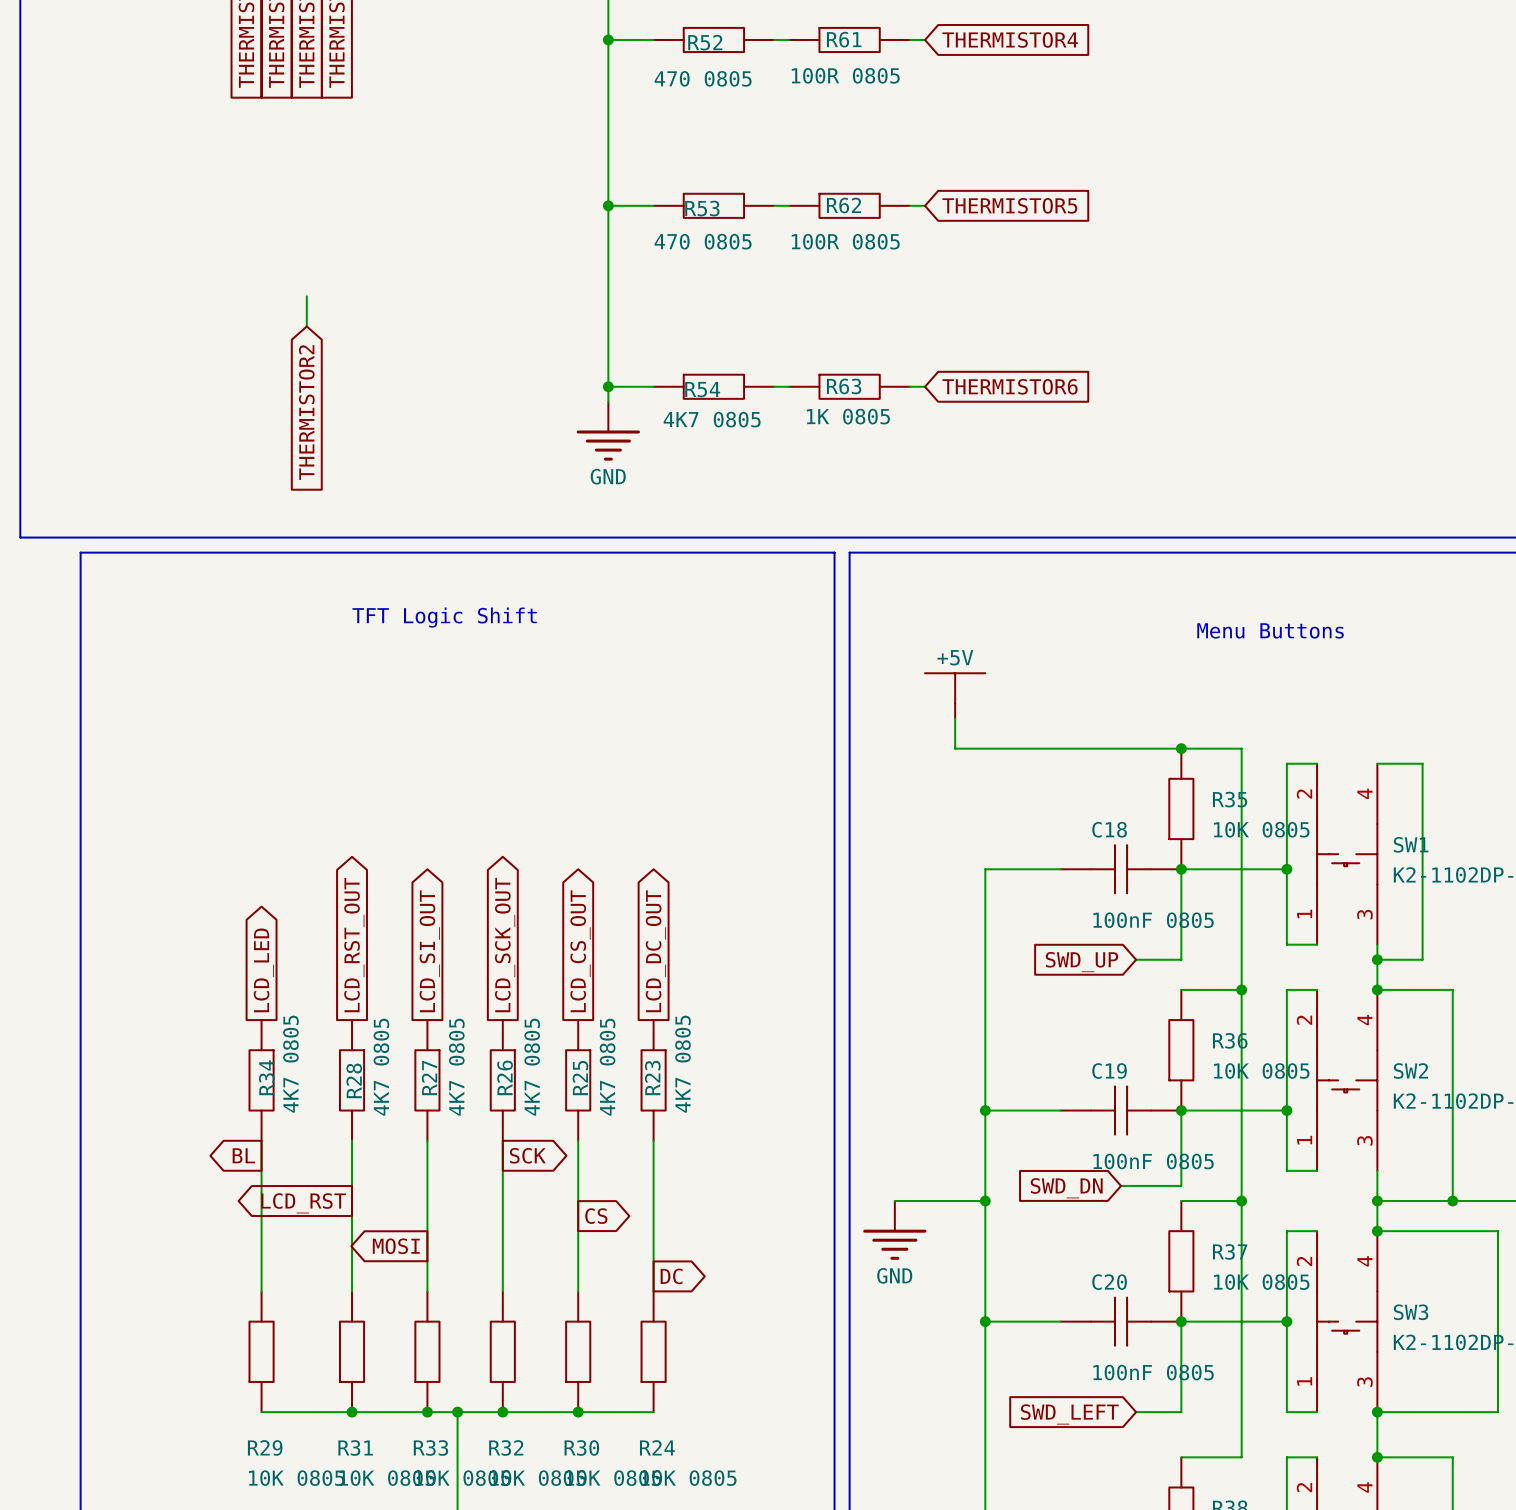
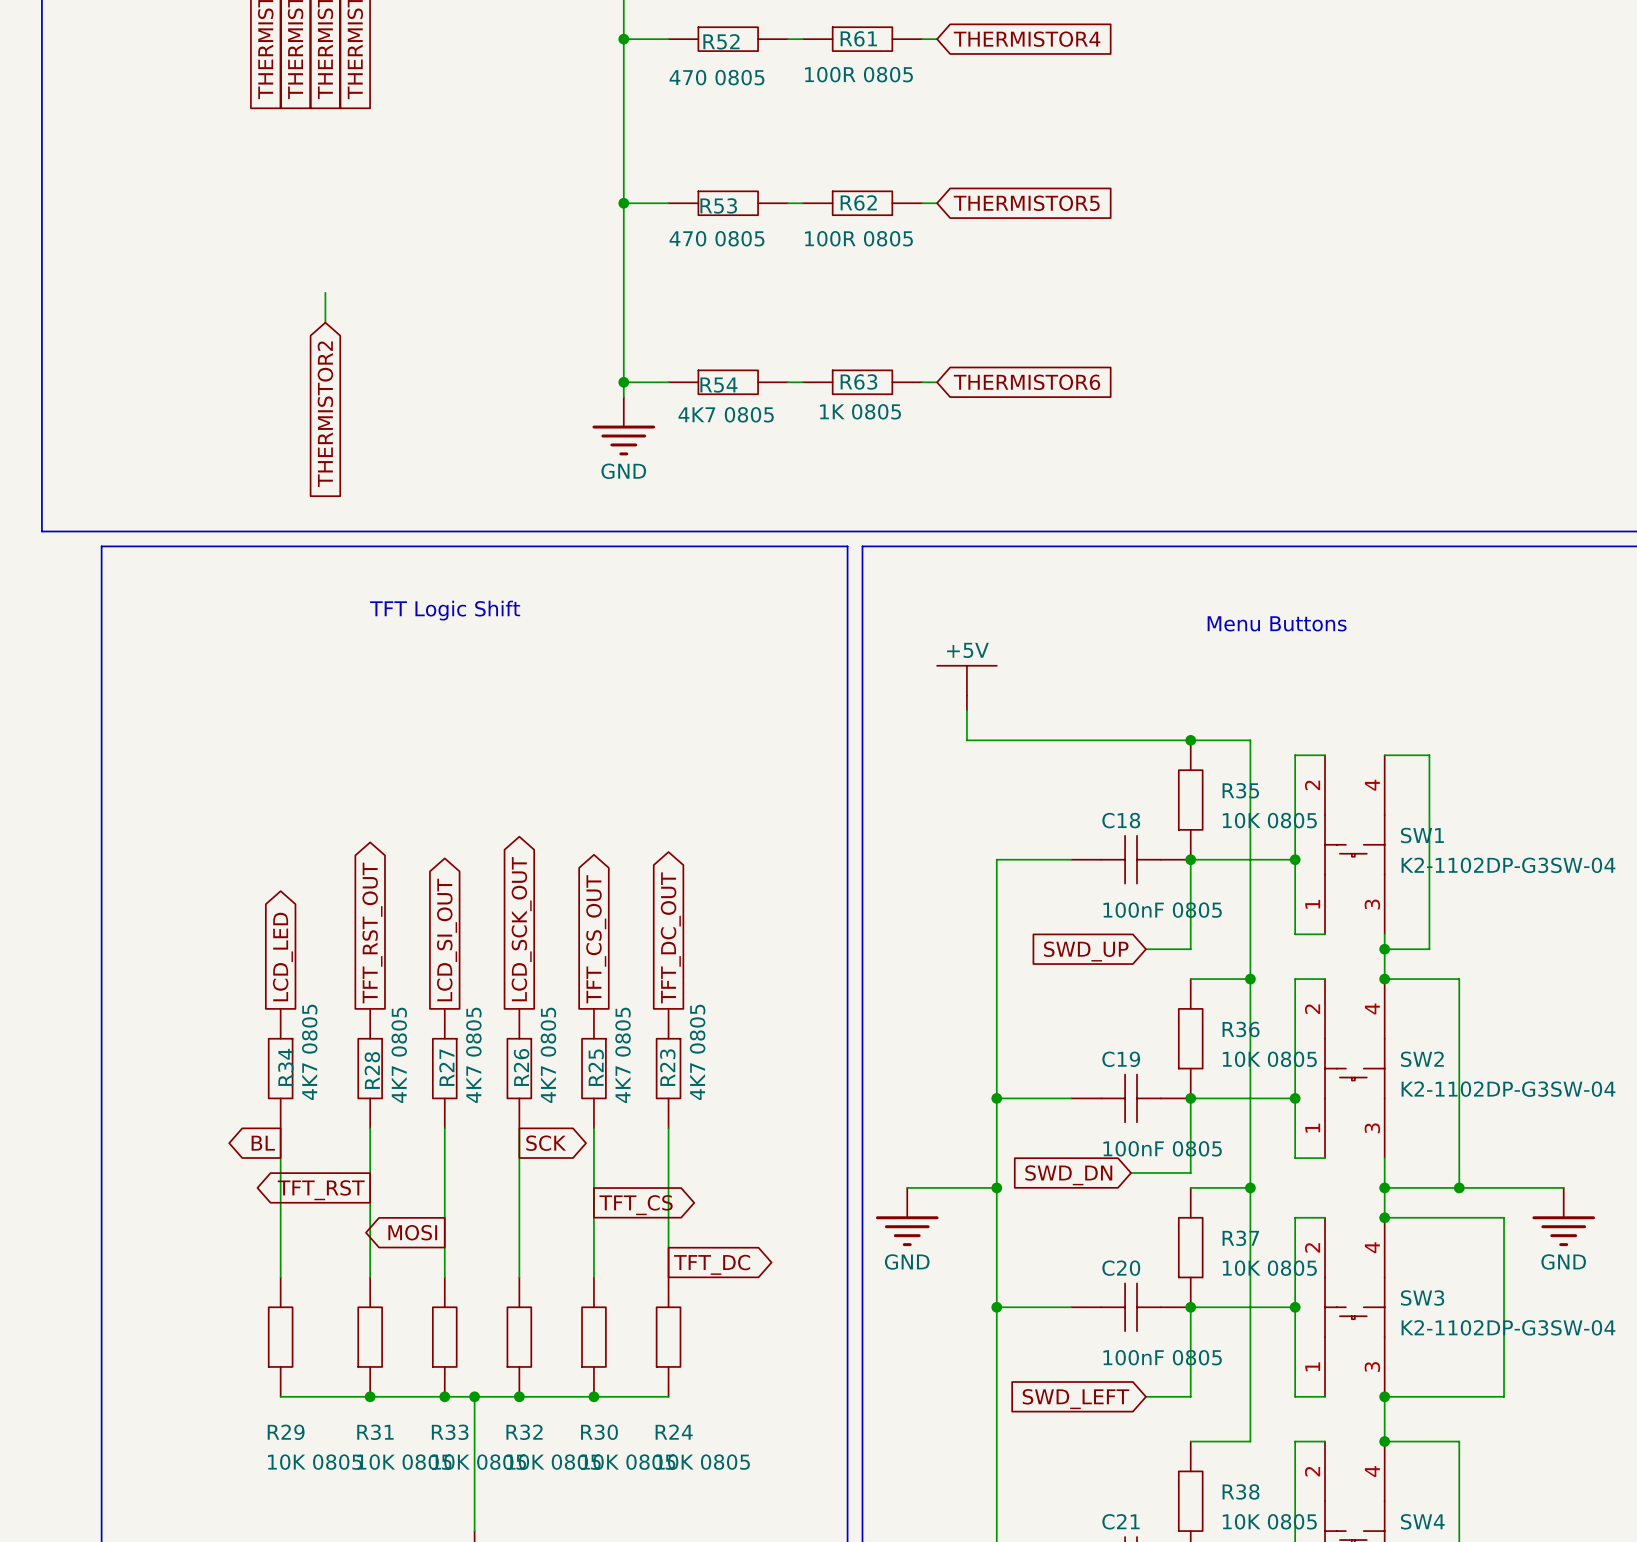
global label: LCD_RST_OUT (354, 945) -> TFT_RST_OUT (372, 933)
global label: LCD_CS_OUT (580, 951) -> TFT_CS_OUT (596, 939)
global label: LCD_DC_OUT (655, 951) -> TFT_DC_OUT (670, 937)
global label: LCD_RST (303, 1203) -> TFT_RST (321, 1190)
global label: CS (596, 1216) -> TFT_CS (636, 1205)
global label: DC (671, 1276) -> TFT_DC (712, 1264)

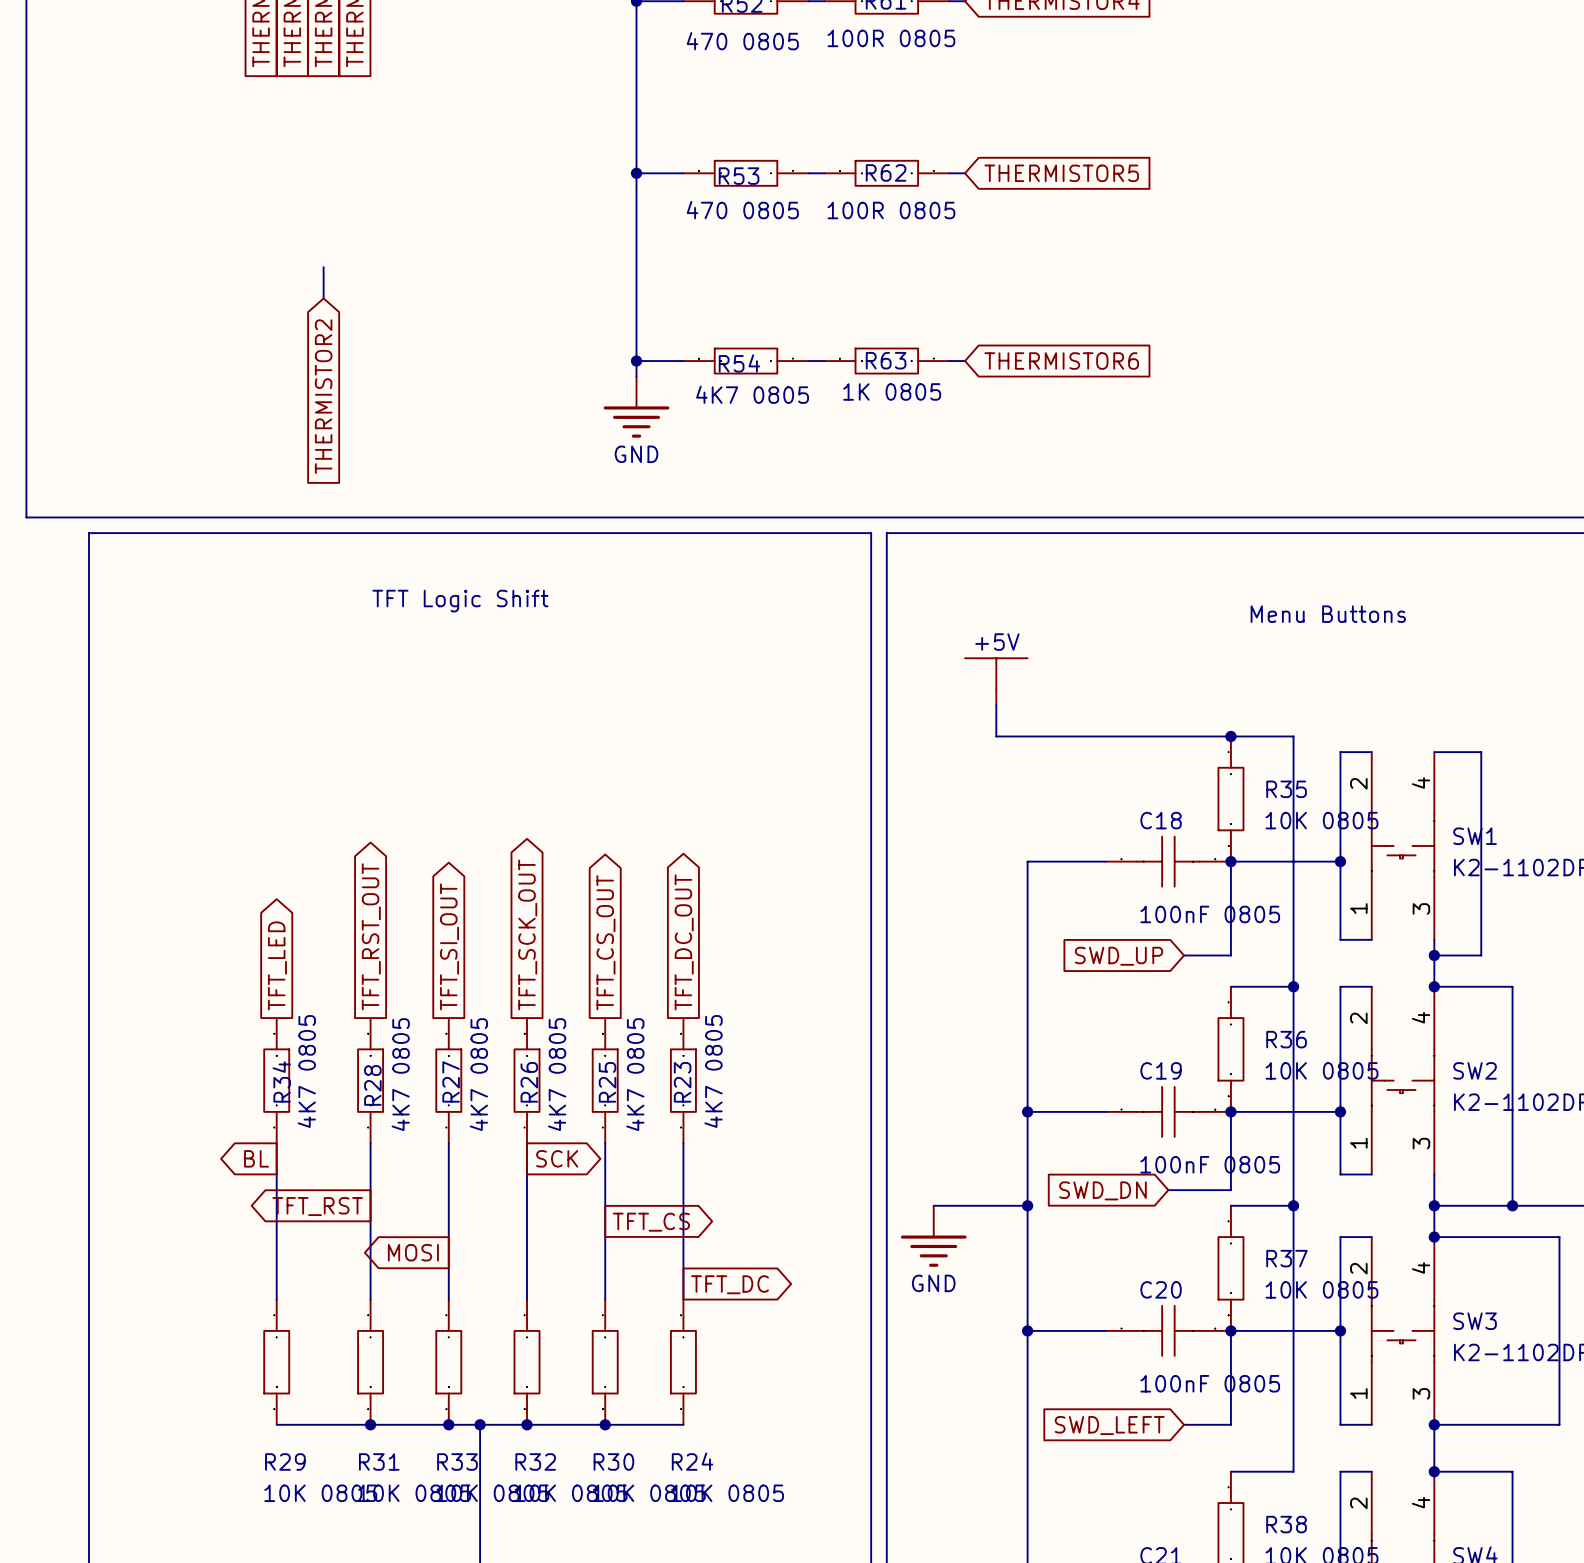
global label: LCD_SCK_OUT (521, 929) -> TFT_SCK_OUT (527, 934)
global label: LCD_SI_OUT (447, 940) -> TFT_SI_OUT (449, 946)
global label: LCD_LED (282, 957) -> TFT_LED (277, 965)

